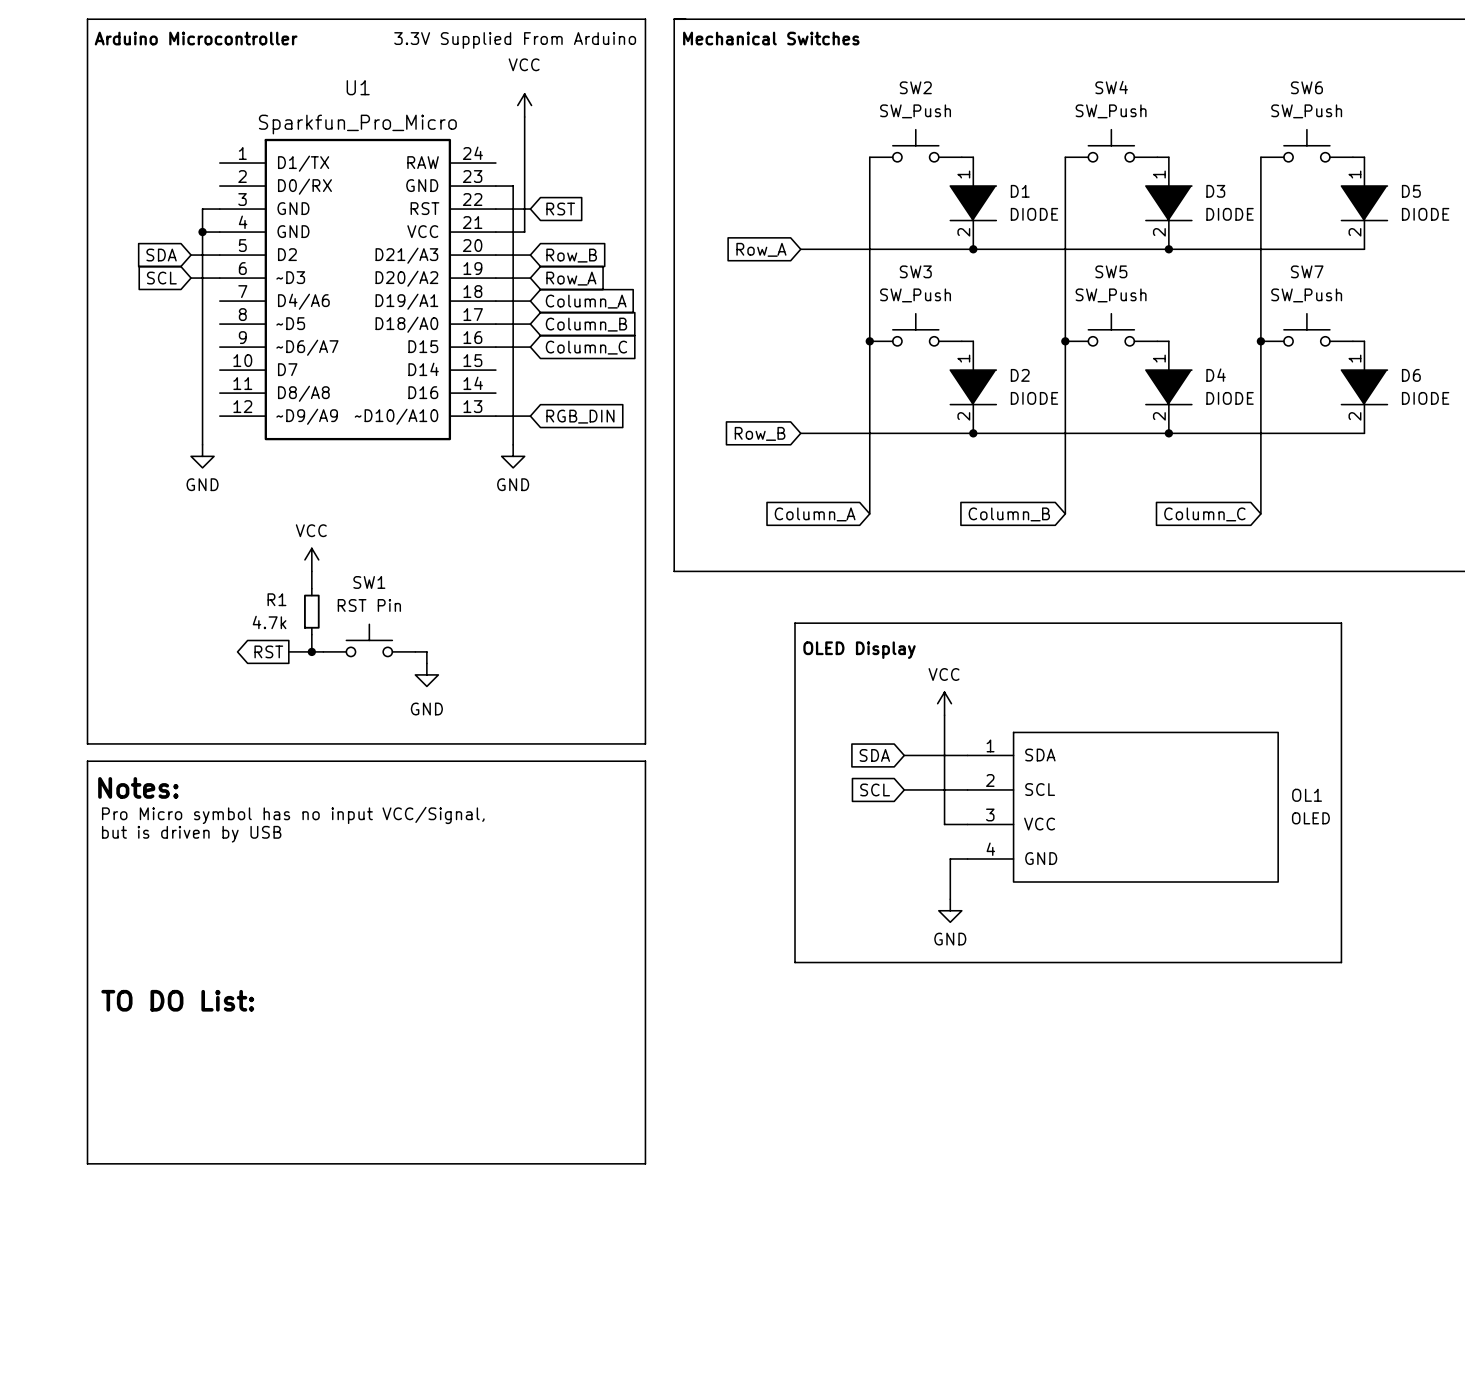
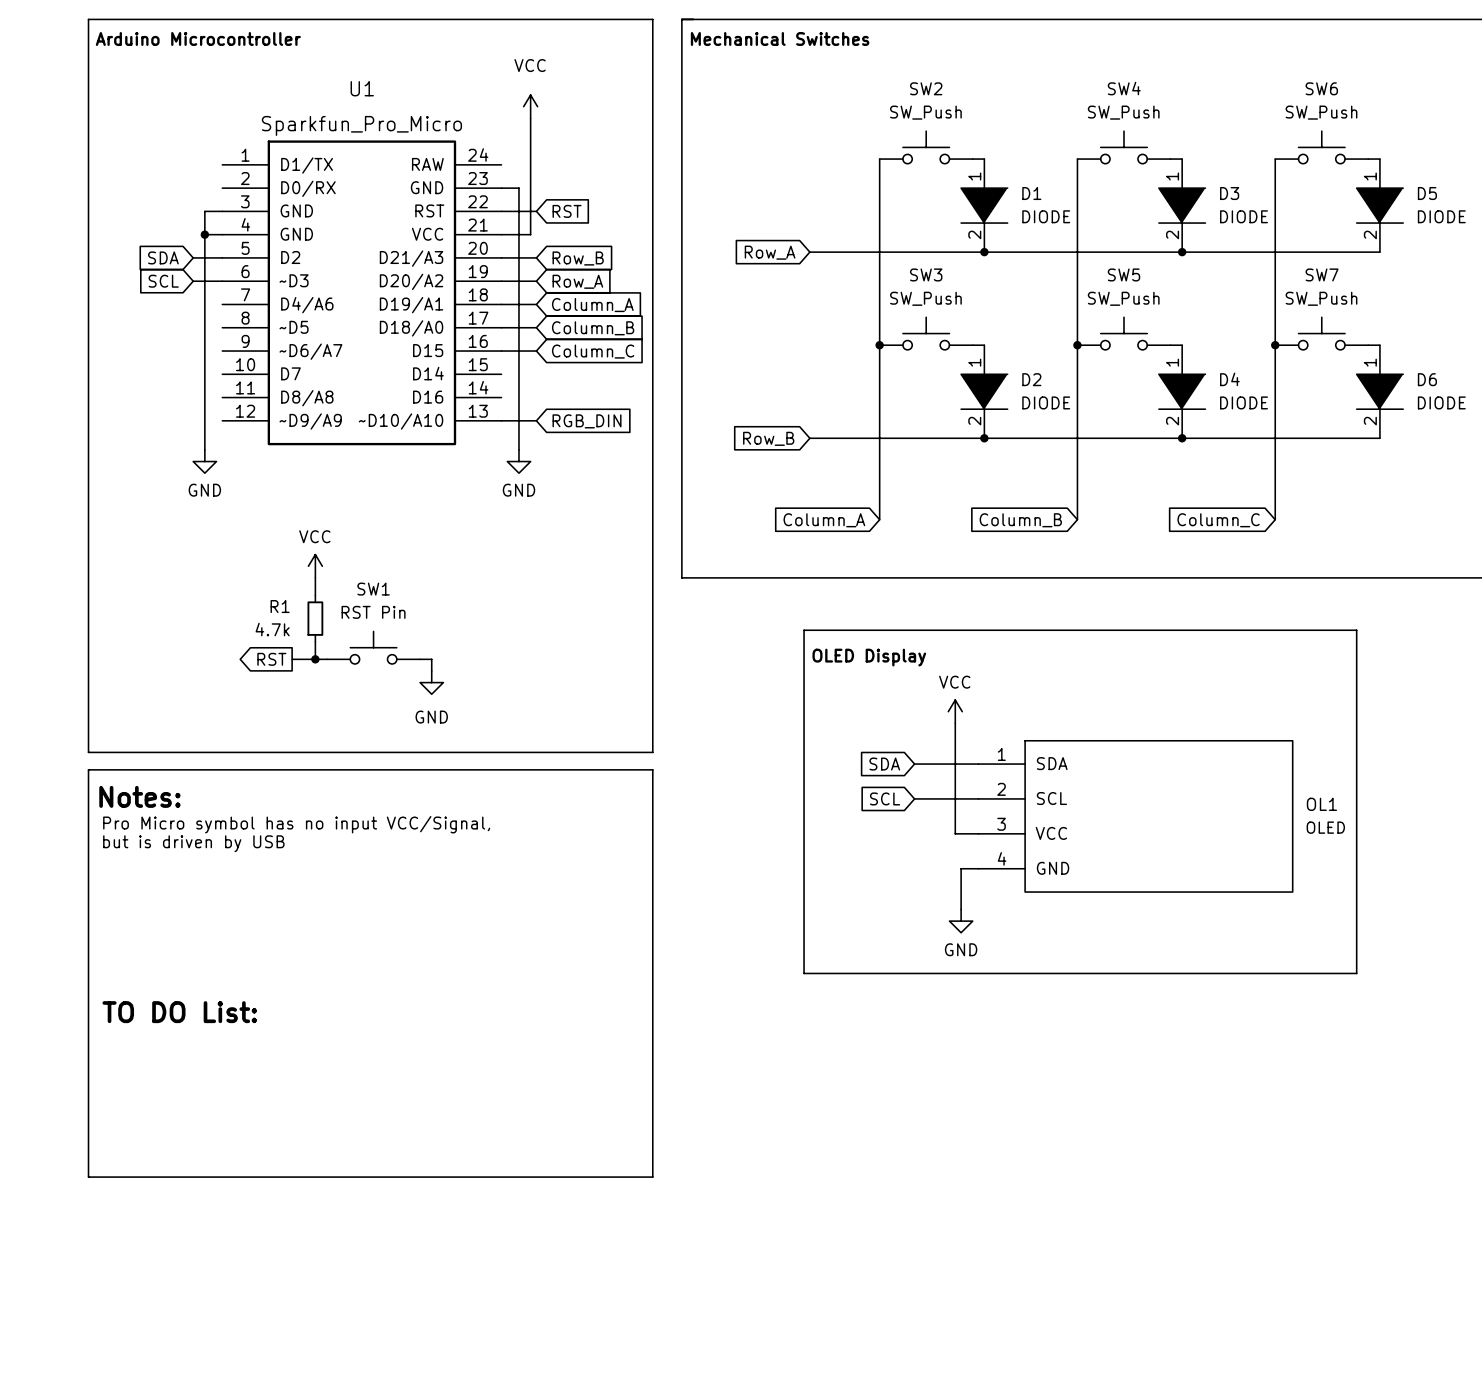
text: 3.3V Supplied From Arduino (515, 40) -> none

